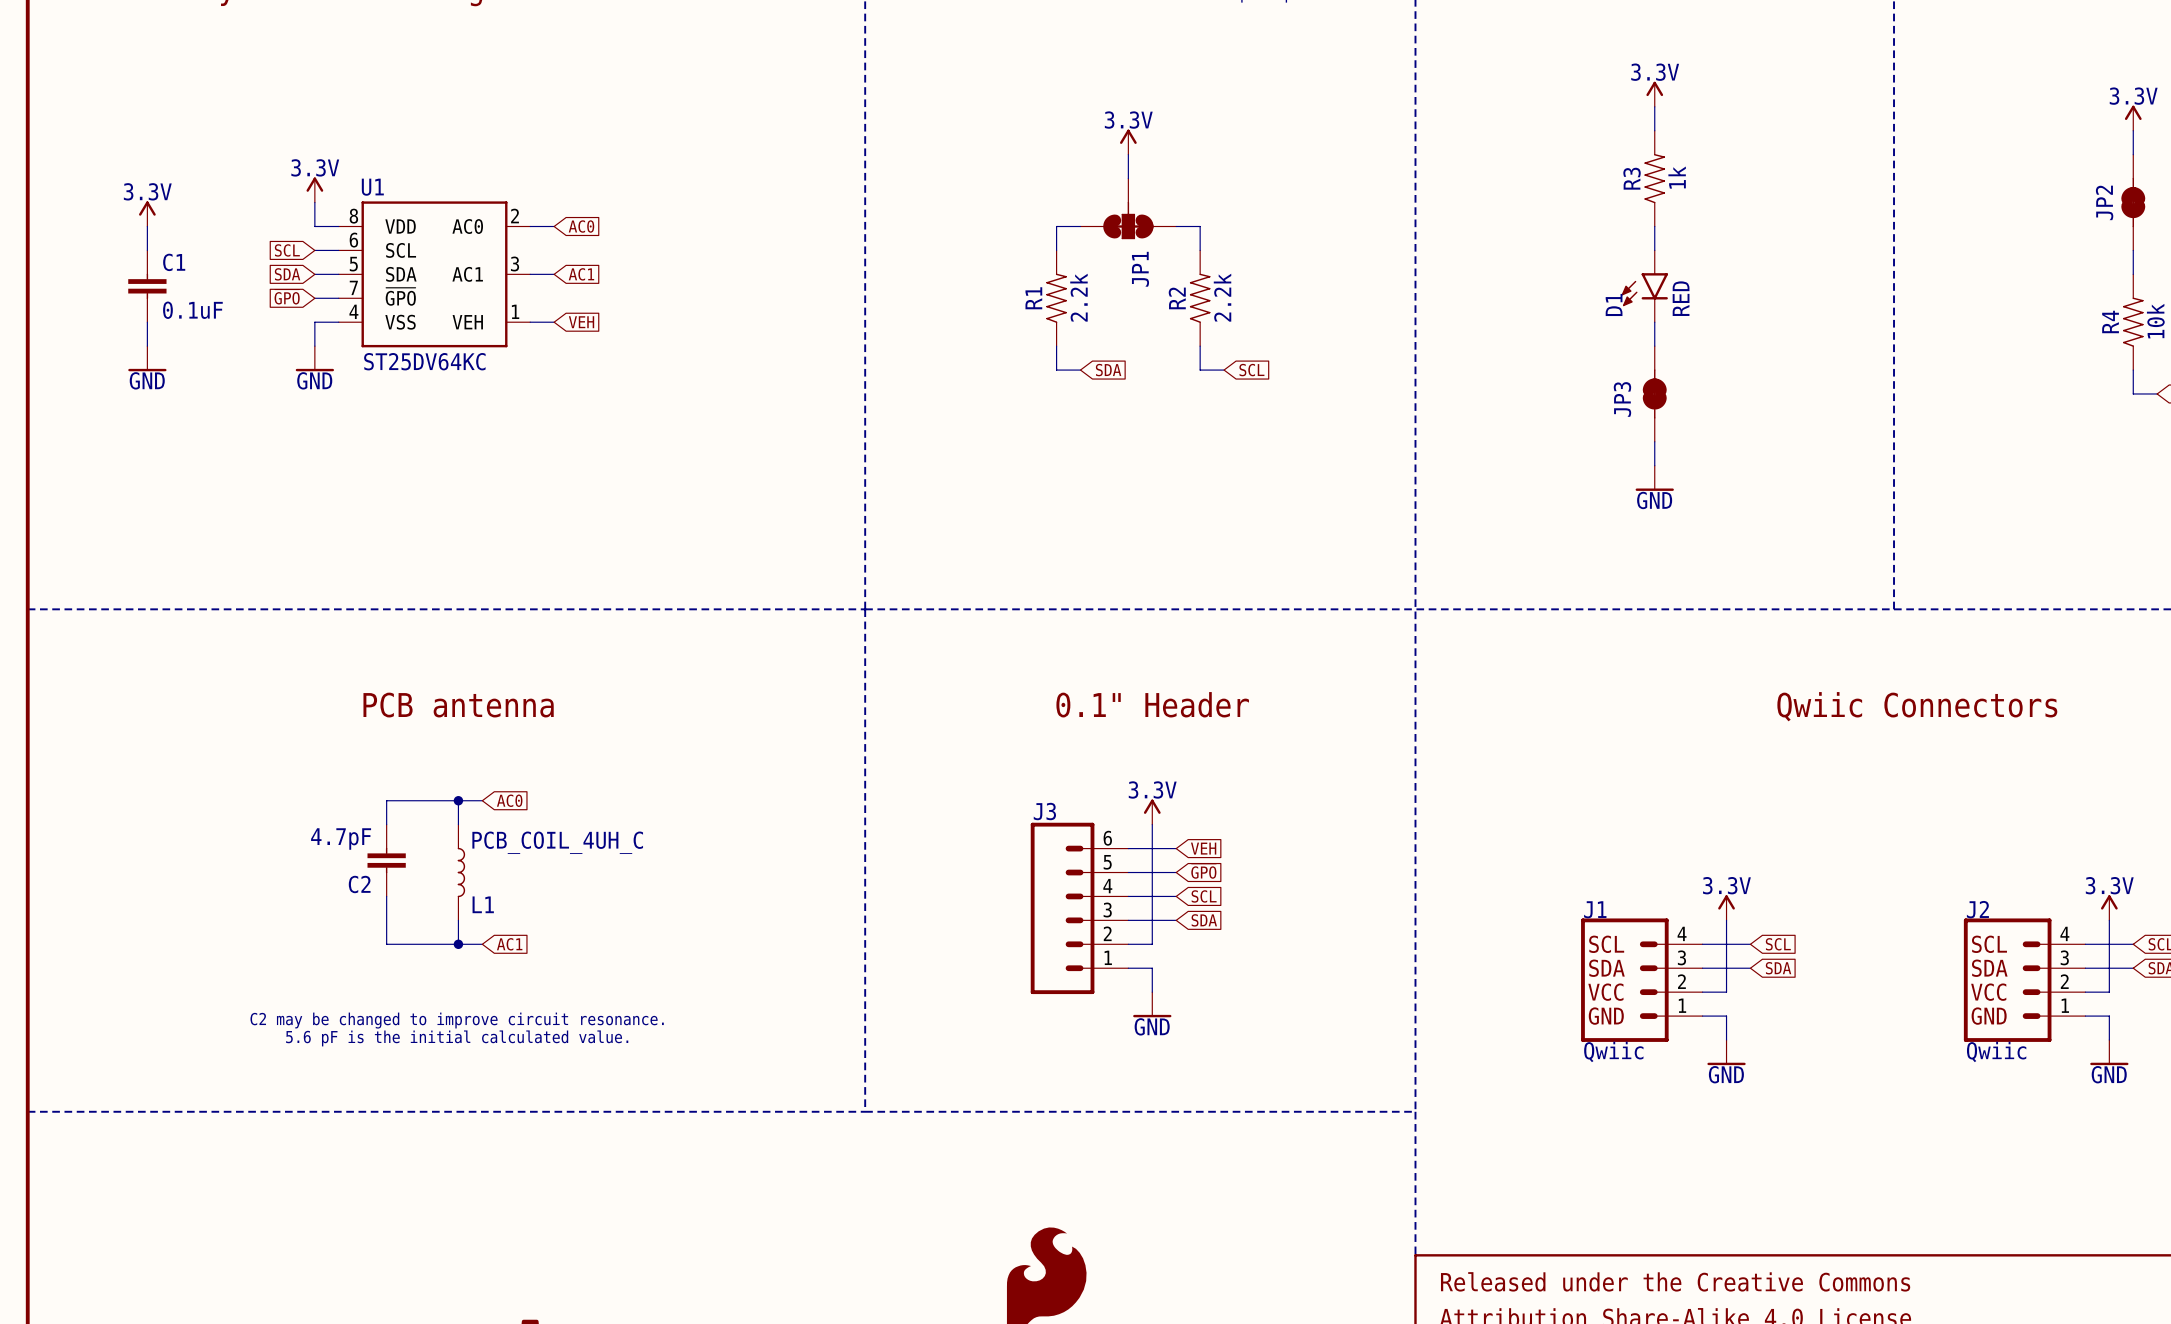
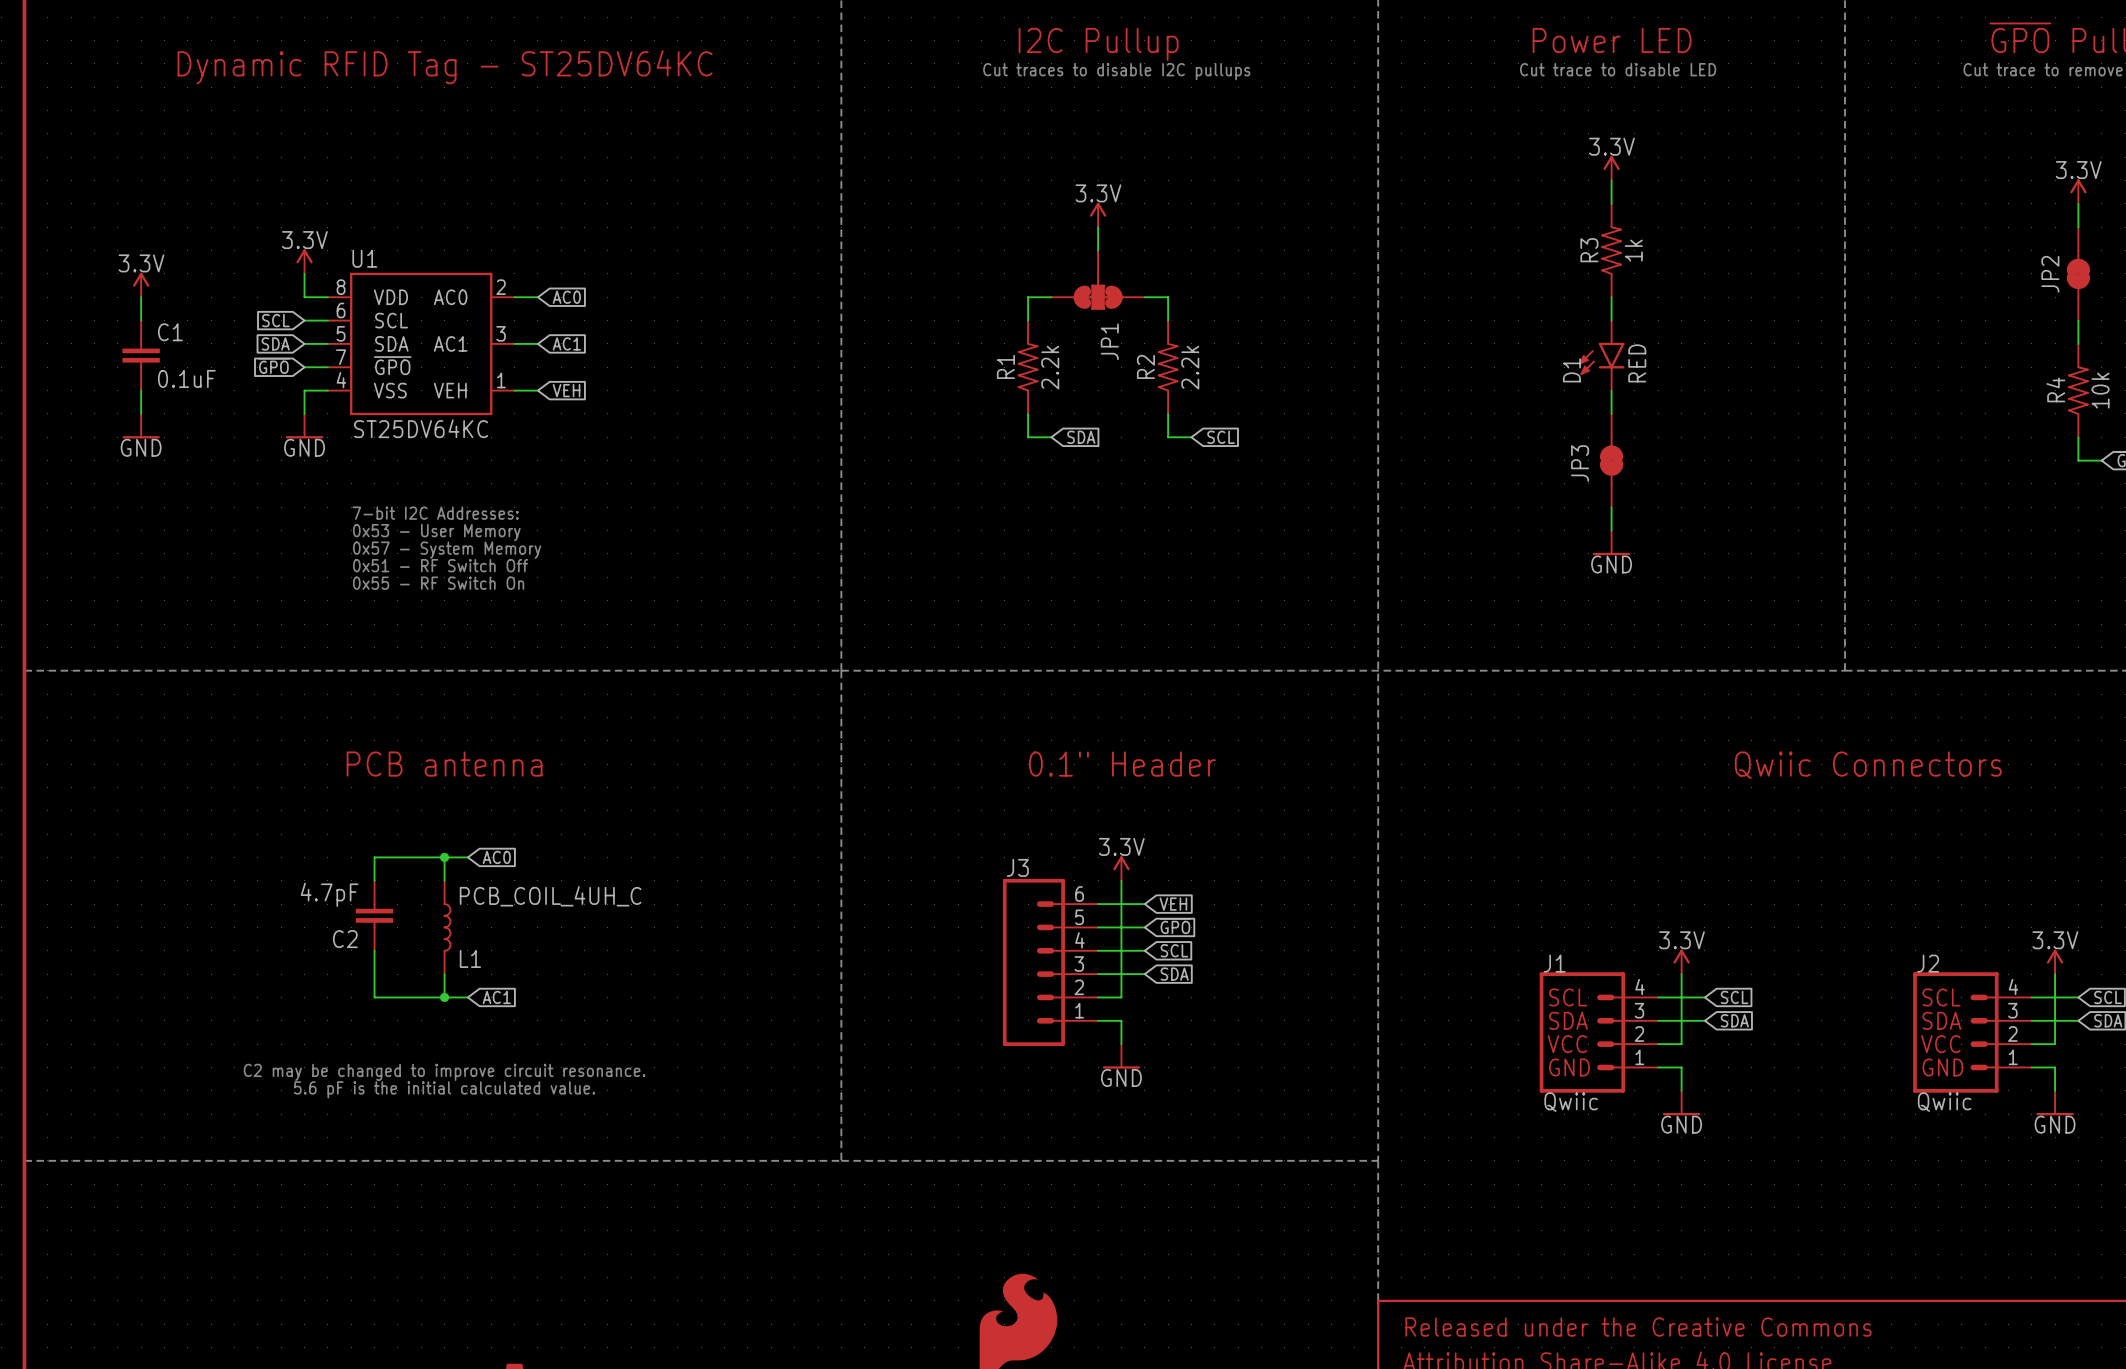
text: none -> 7-bit I2C Addresses: (435, 513)
text: none -> 0x53 - User Memory (436, 532)
text: none -> 0x57 - System Memory (447, 550)
text: none -> 0x51 - RF Switch Off (440, 565)
text: none -> 0x55 - RF Switch On (438, 583)

